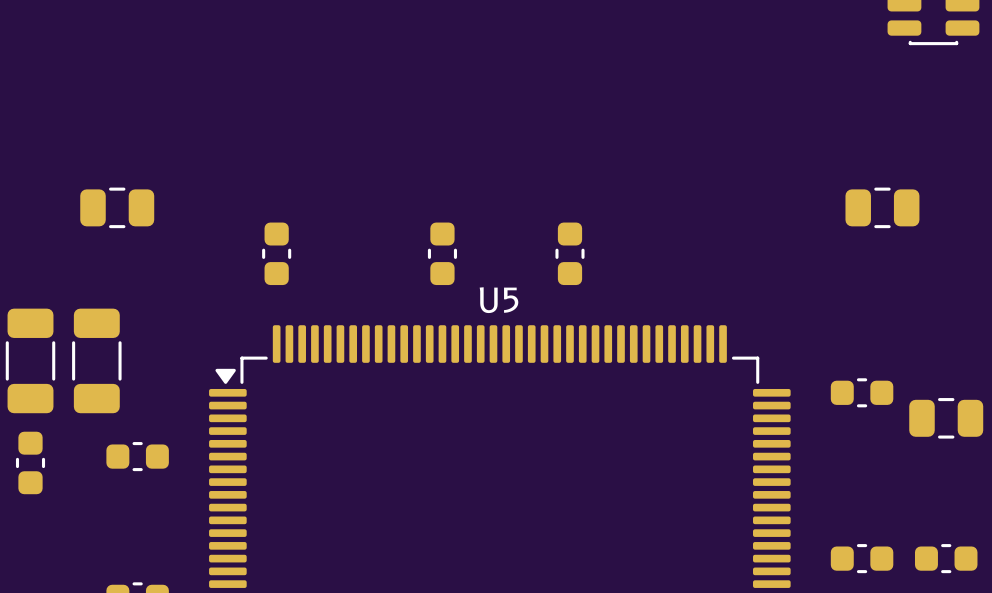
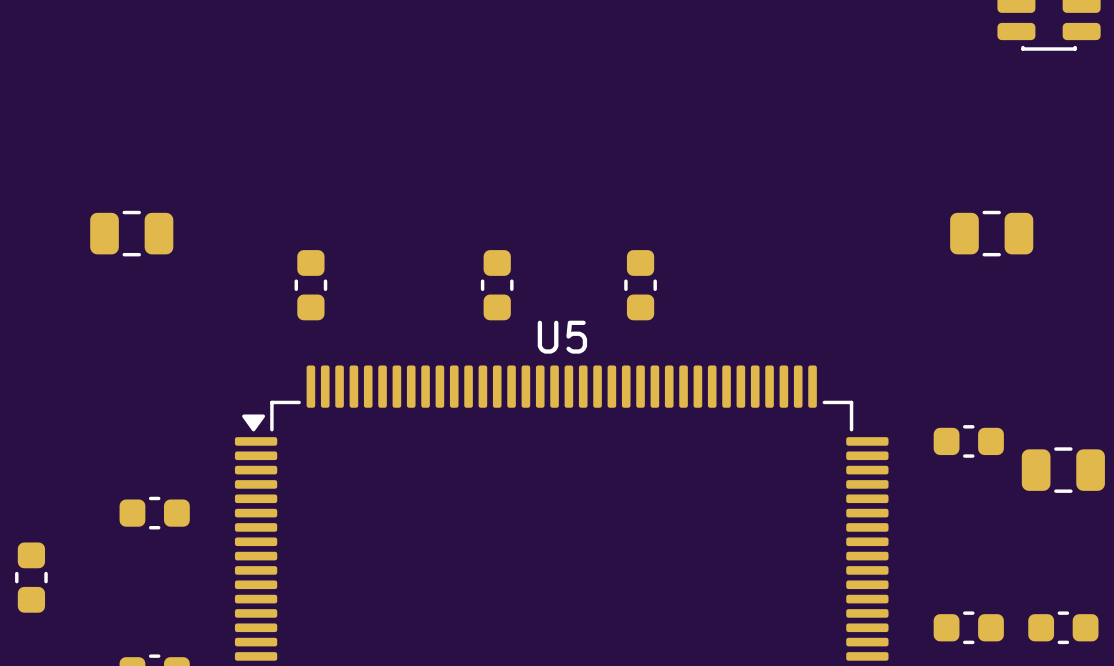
part: (30, 360) -> none
part: (96, 360) -> none
part position: (30, 462) -> (31, 577)

